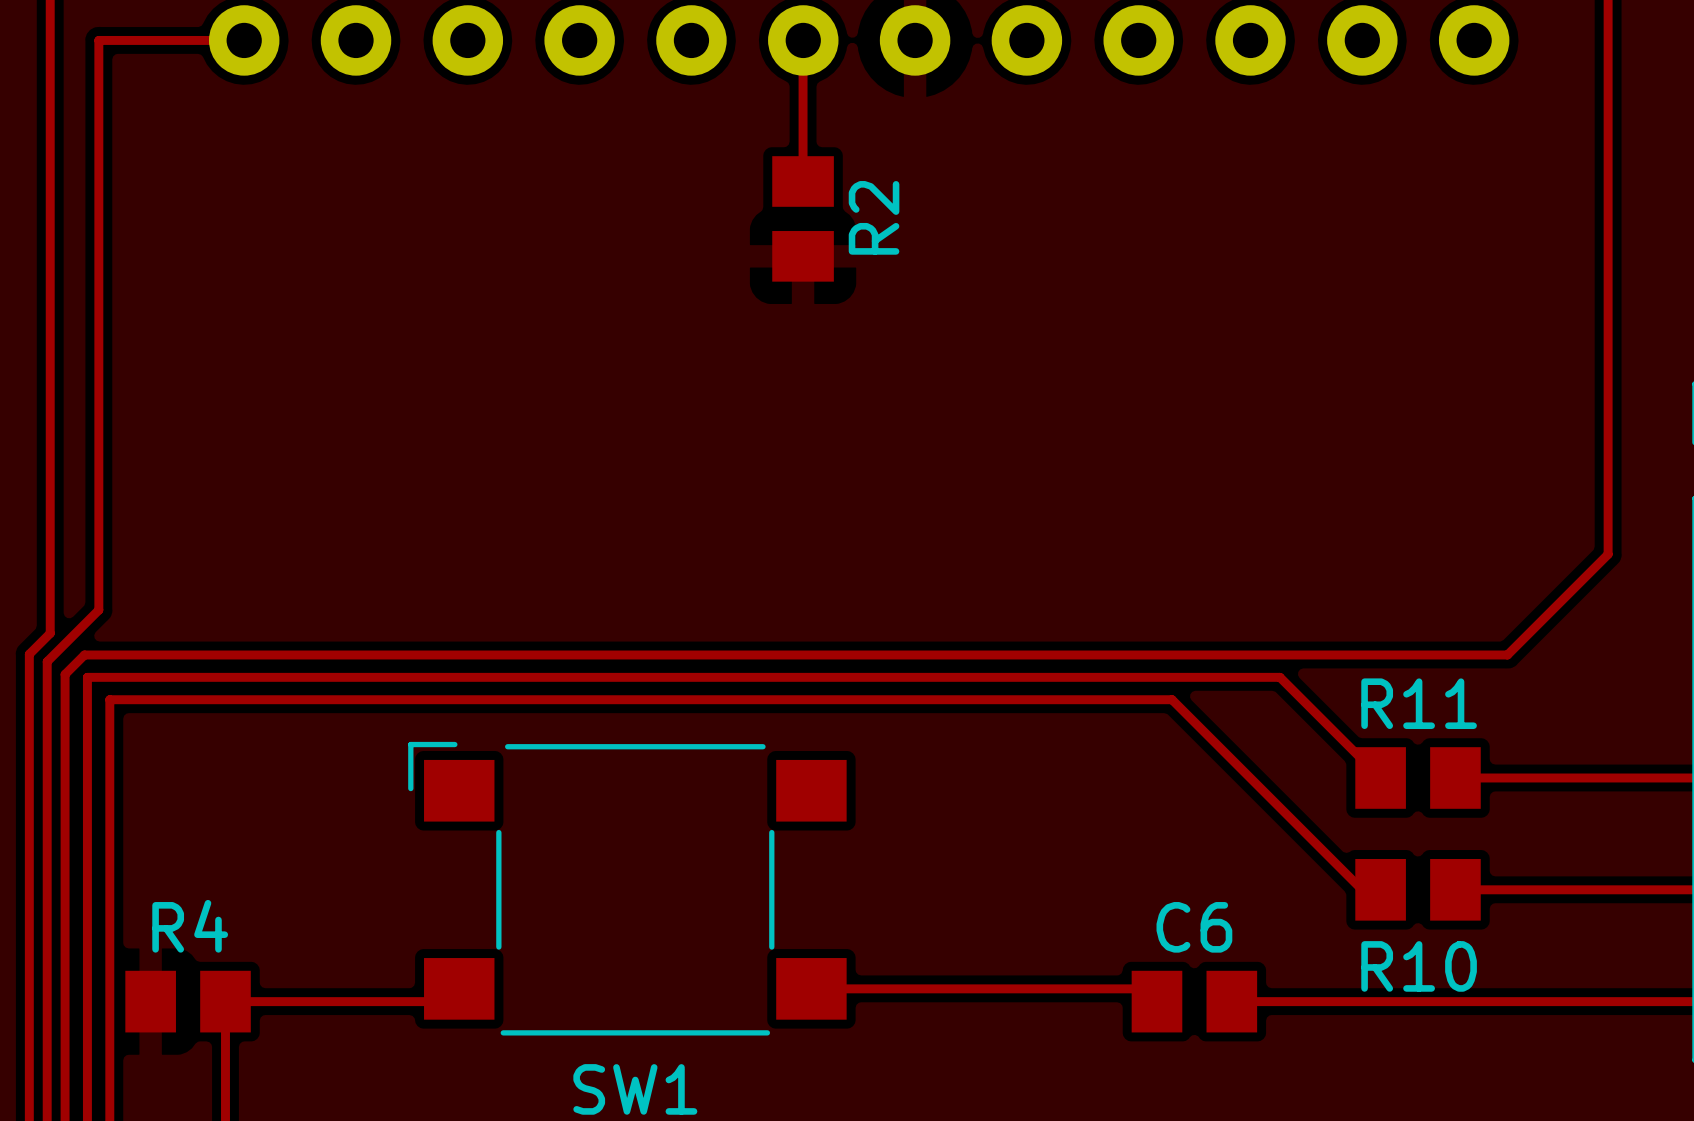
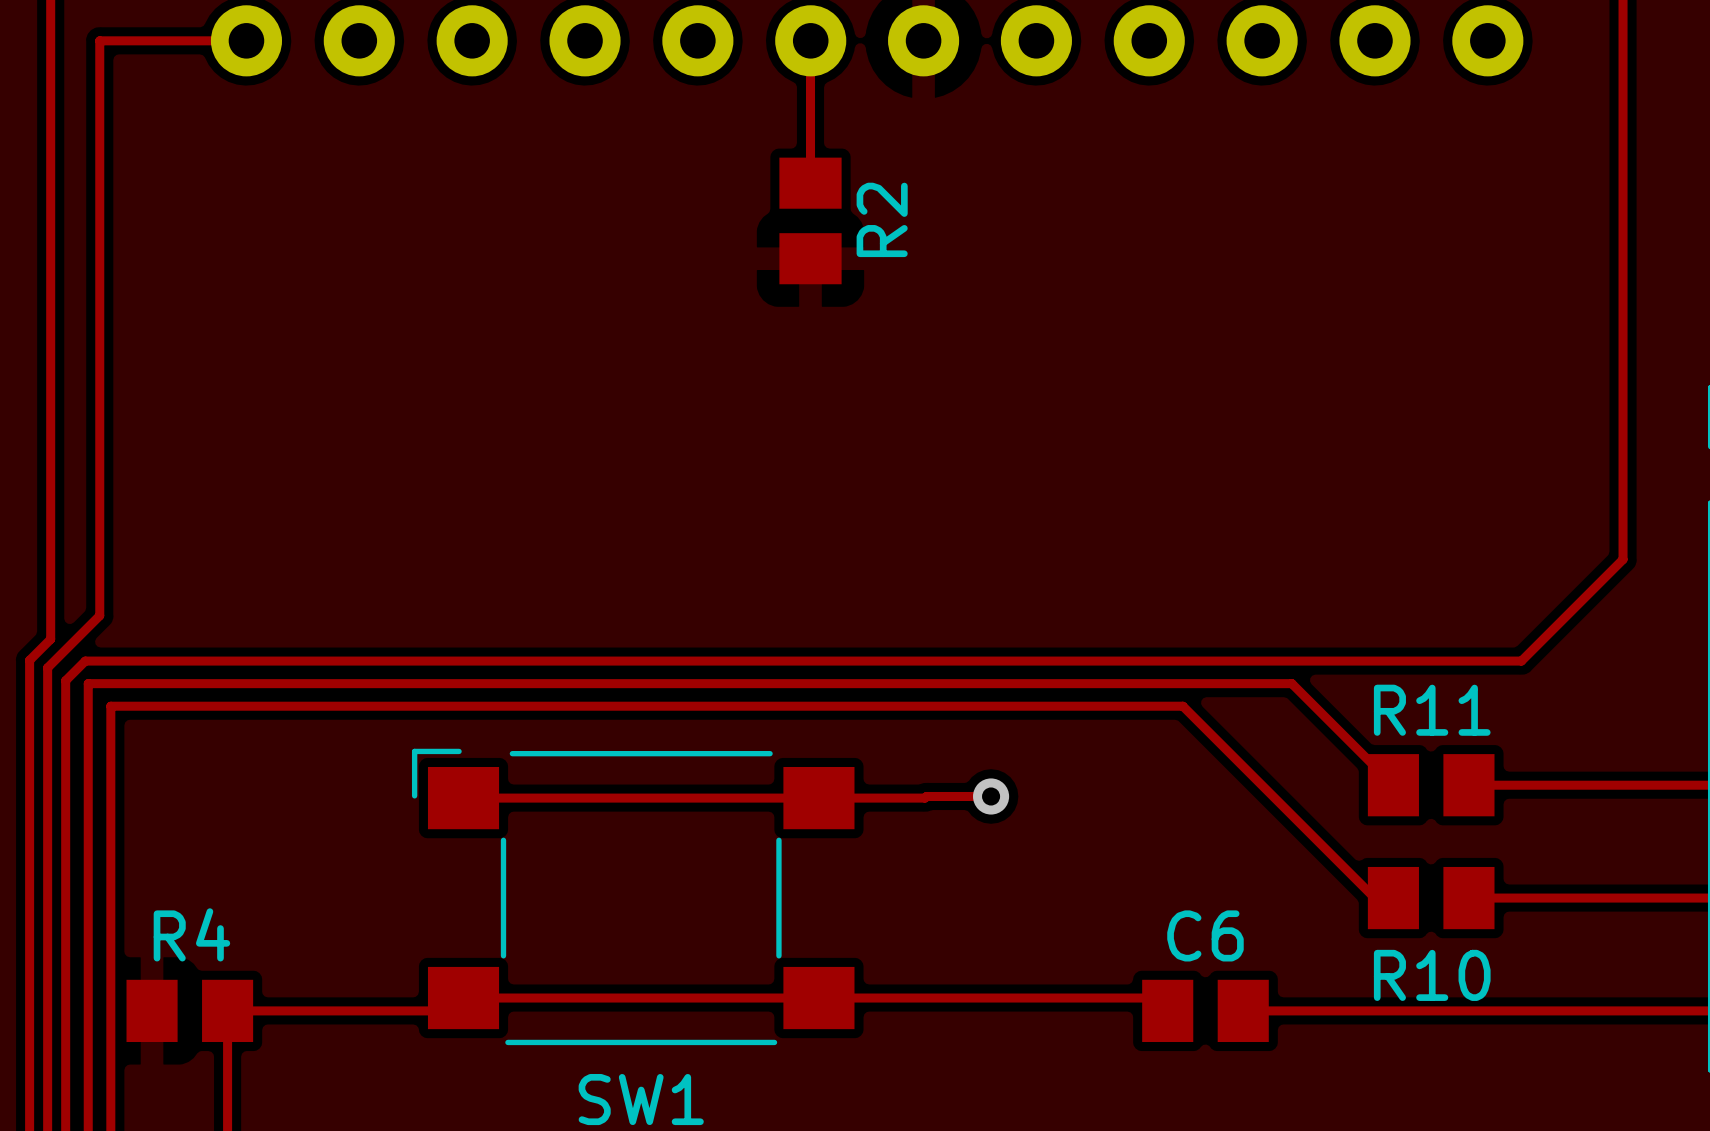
track: none -> (991, 796) (463, 798)
via: none -> (991, 796)
track: none -> (463, 998) (818, 998)

